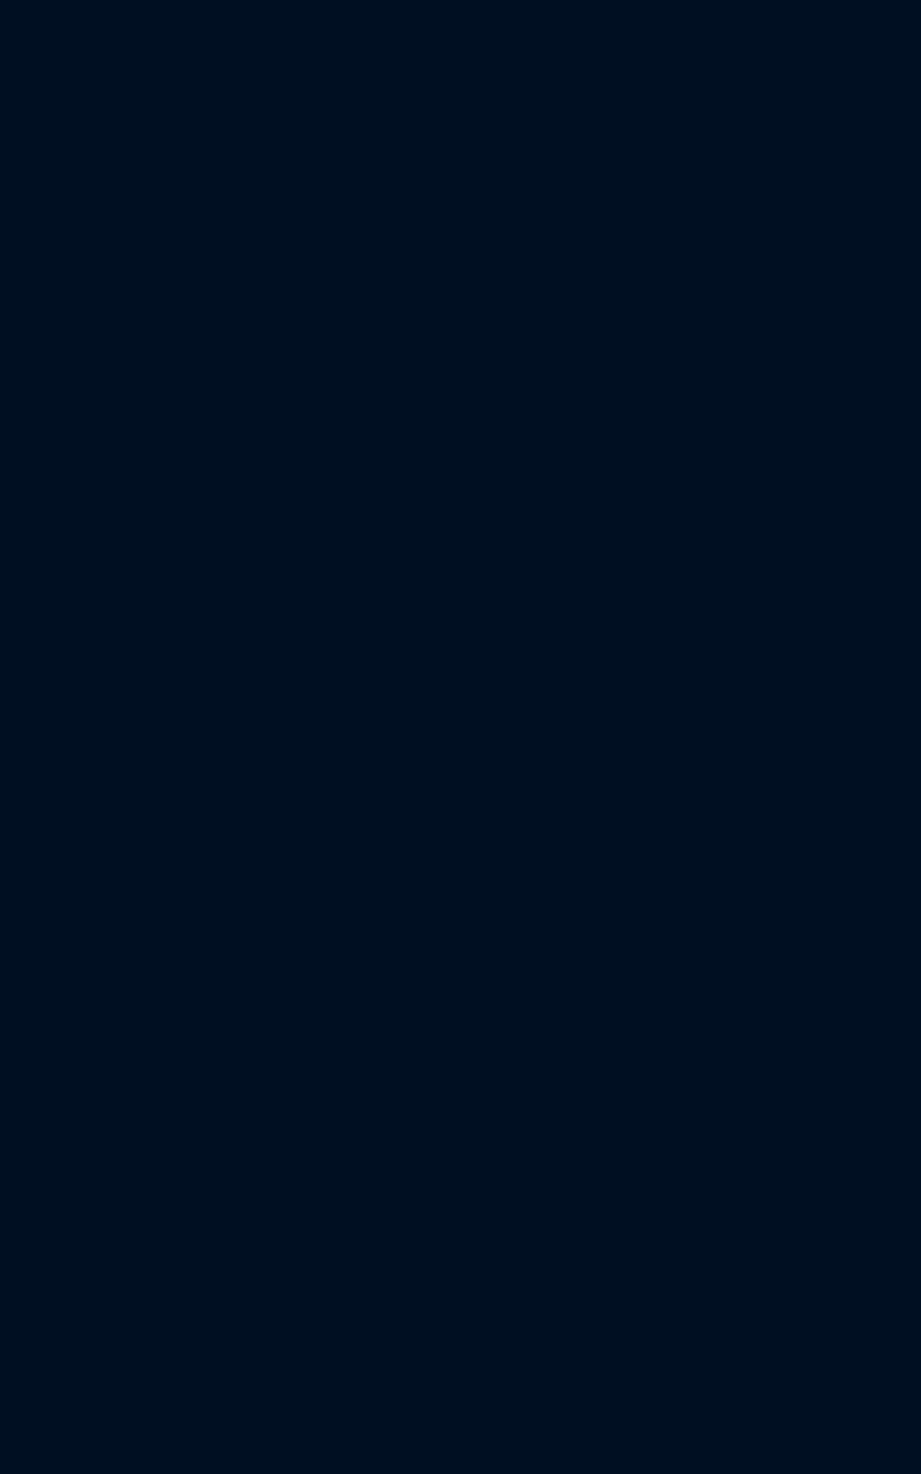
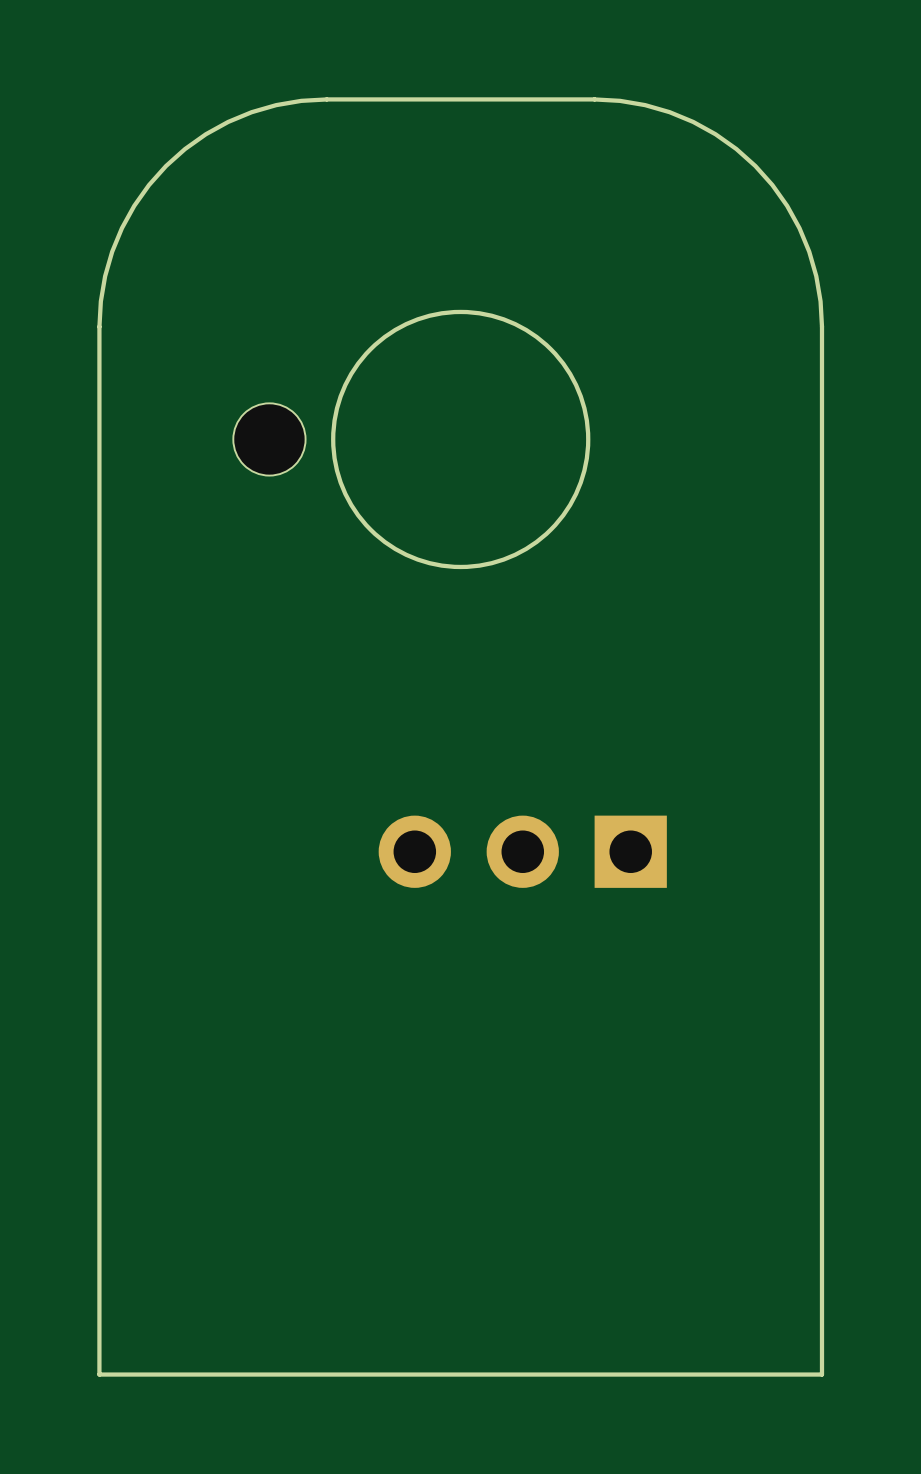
board edge: none -> (594, 99) (326, 99) (301, 100) (251, 112) (205, 134) (166, 166) (134, 205) (112, 251) (105, 276) (99, 326) (99, 1374) (822, 1374) (822, 326) (816, 276) (799, 228) (787, 205) (755, 166) (736, 149) (715, 134) (669, 112) (645, 105) (594, 99)
round board edge: none -> [331, 309, 591, 570]
part: none -> (269, 439)
part: none -> (522, 851)

